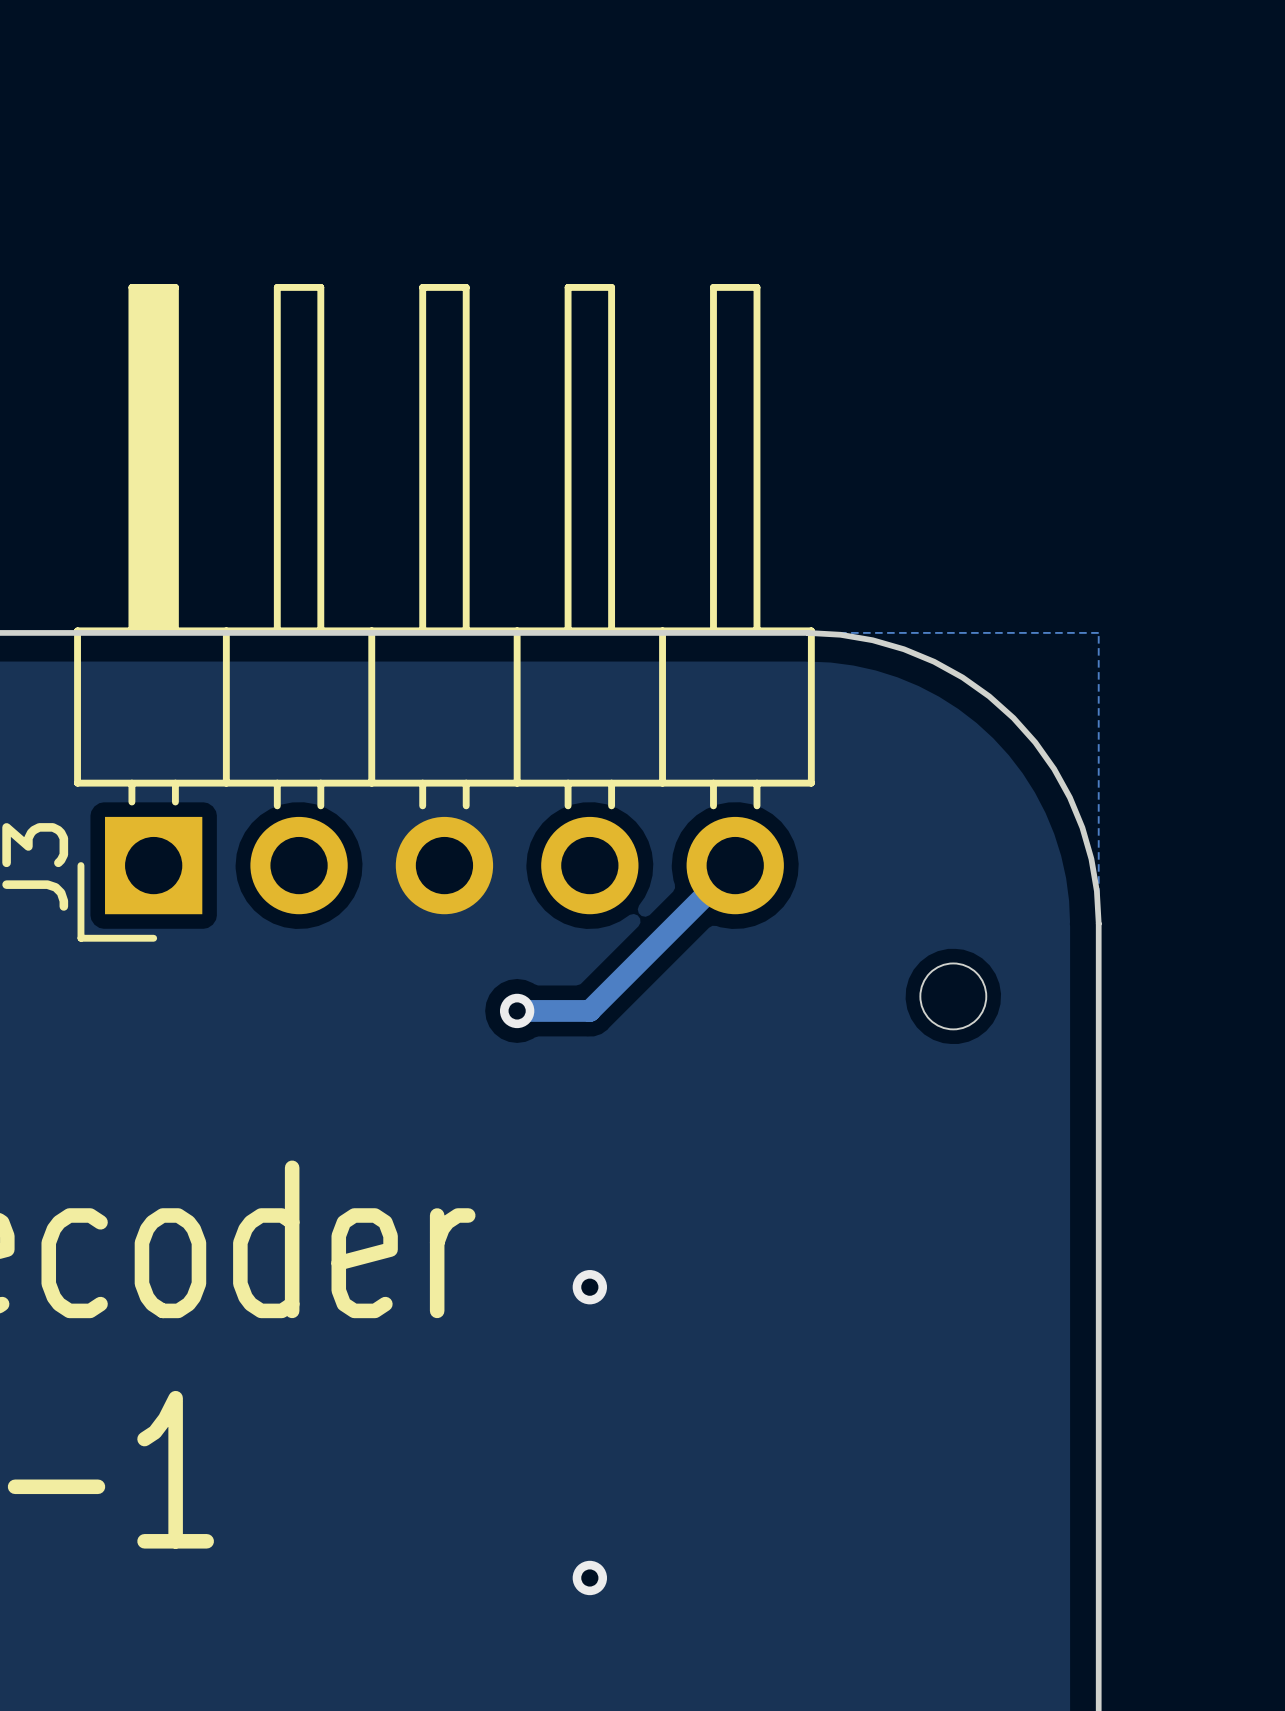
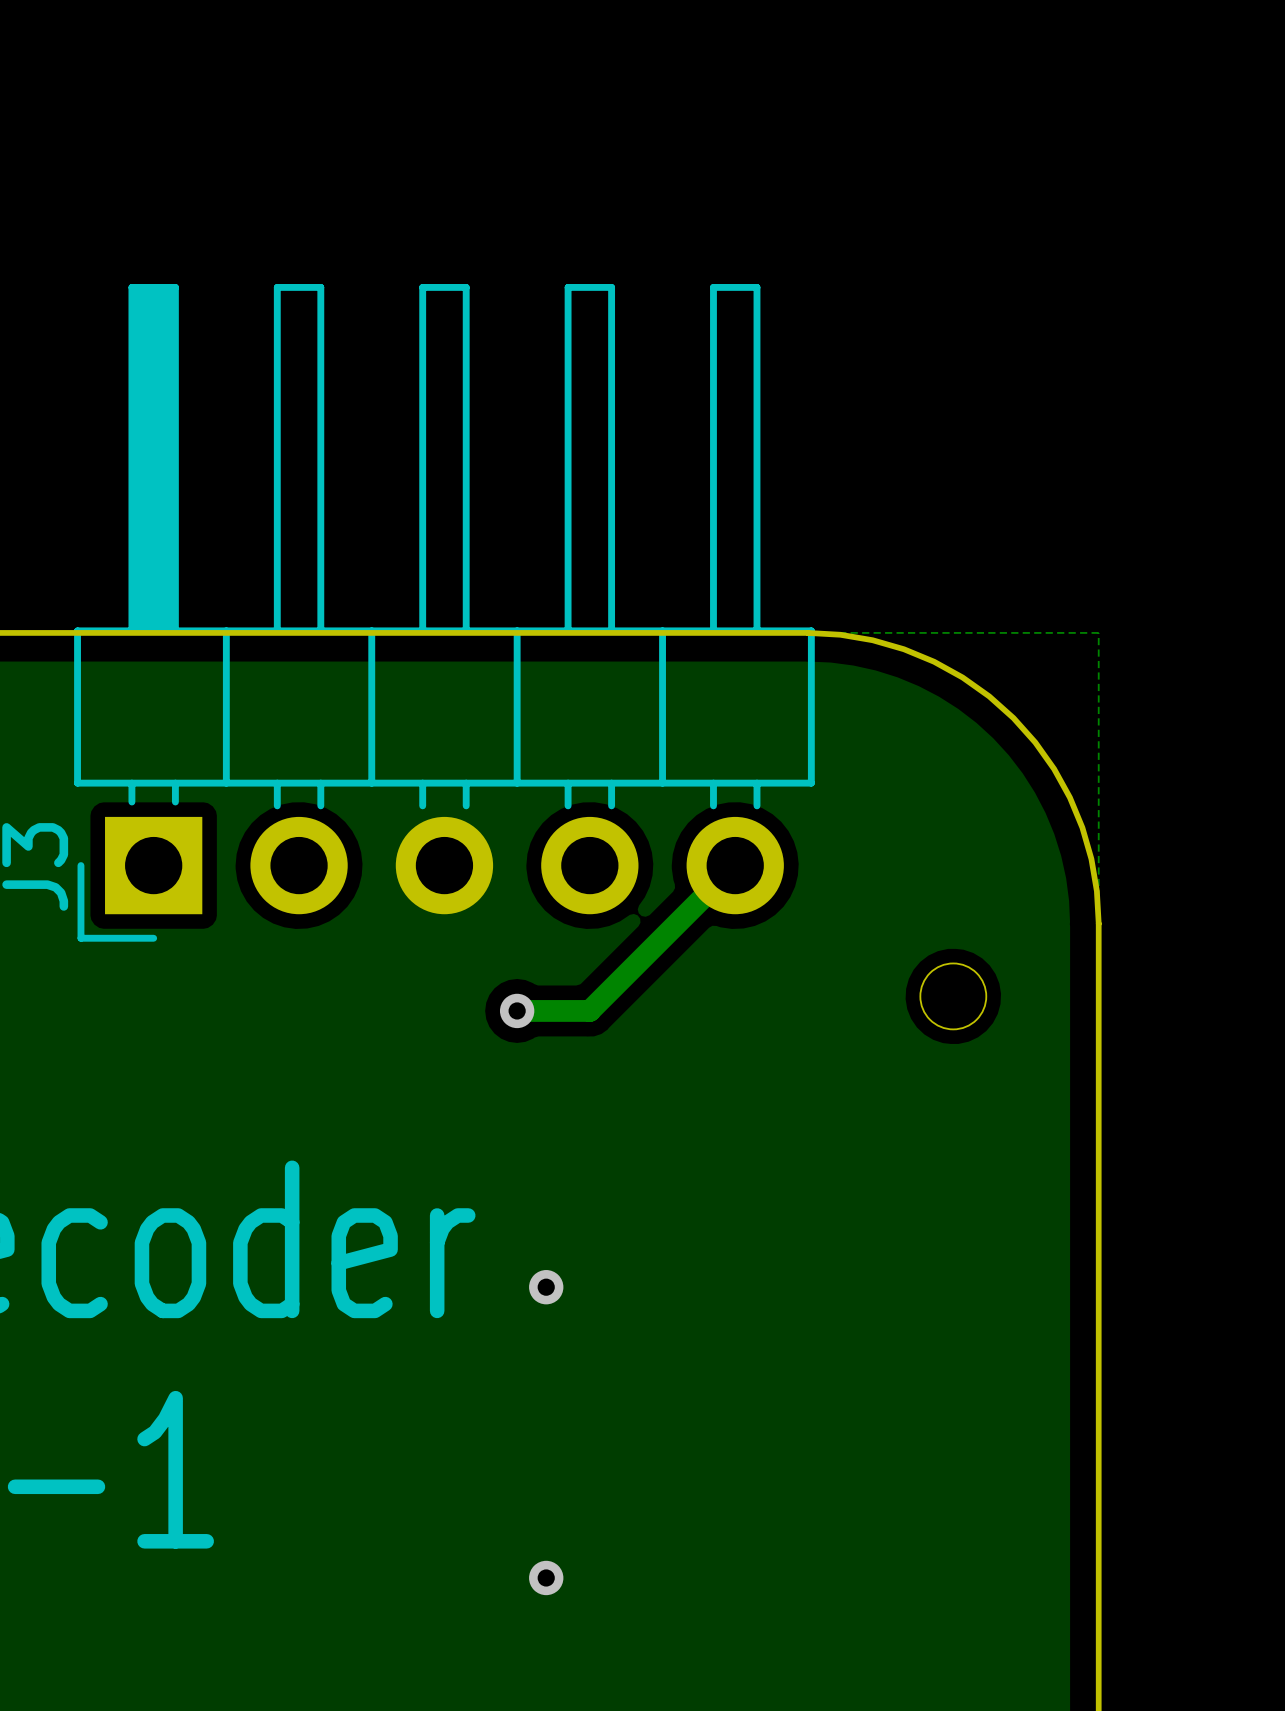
via position: (589, 1287) -> (546, 1287)
via position: (589, 1577) -> (546, 1577)

